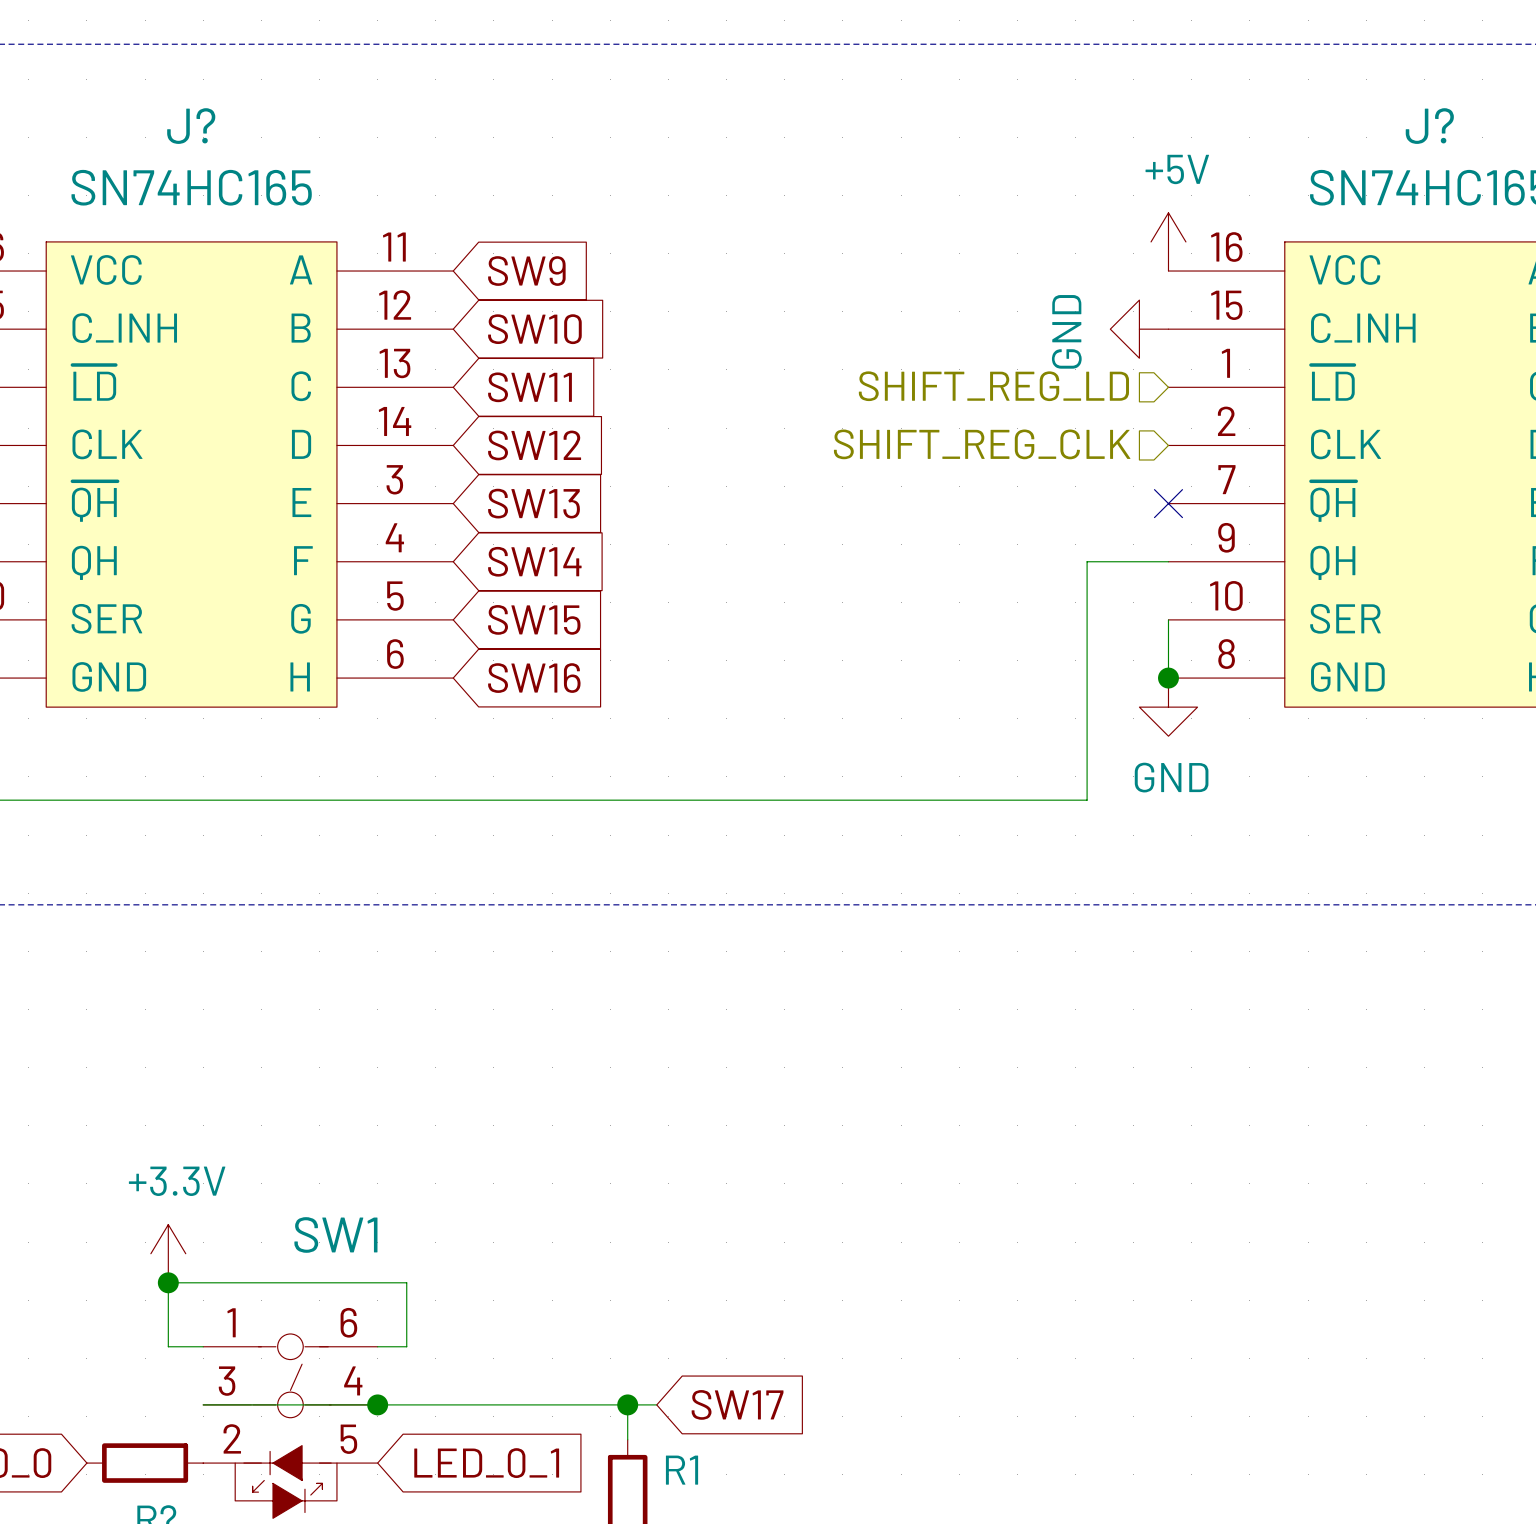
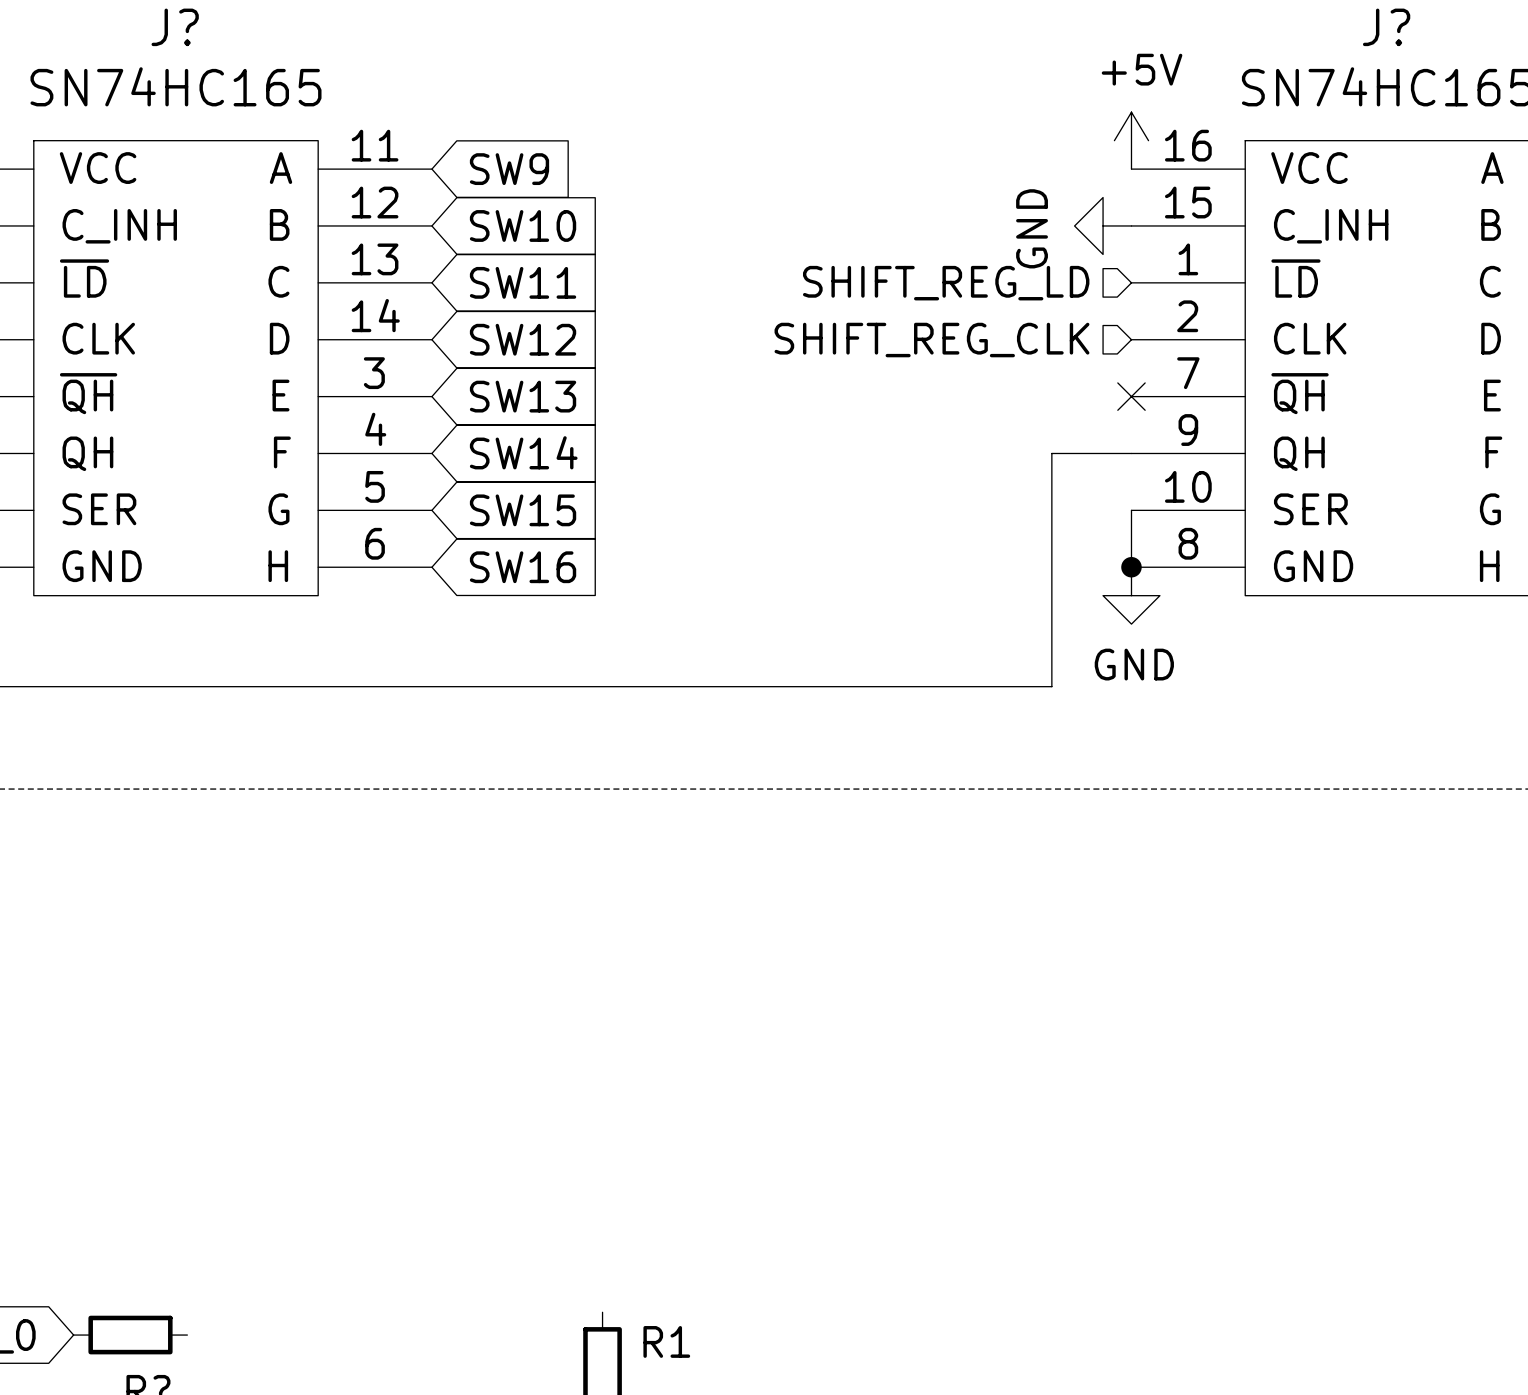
power symbol: +3.3V (168, 1253) -> none
junction: (168, 1282) -> none
wire: (203, 1346) (168, 1346) (168, 1282) (406, 1282) (406, 1346) (377, 1346) -> none
wire: (203, 1404) (656, 1404) -> none
junction: (377, 1404) -> none
wire: (627, 1404) (627, 1439) -> none
junction: (627, 1404) -> none
global label: SW17 (737, 1404) -> none
SW1: (290, 1426) -> none
global label: LED_0_1 (486, 1463) -> none

